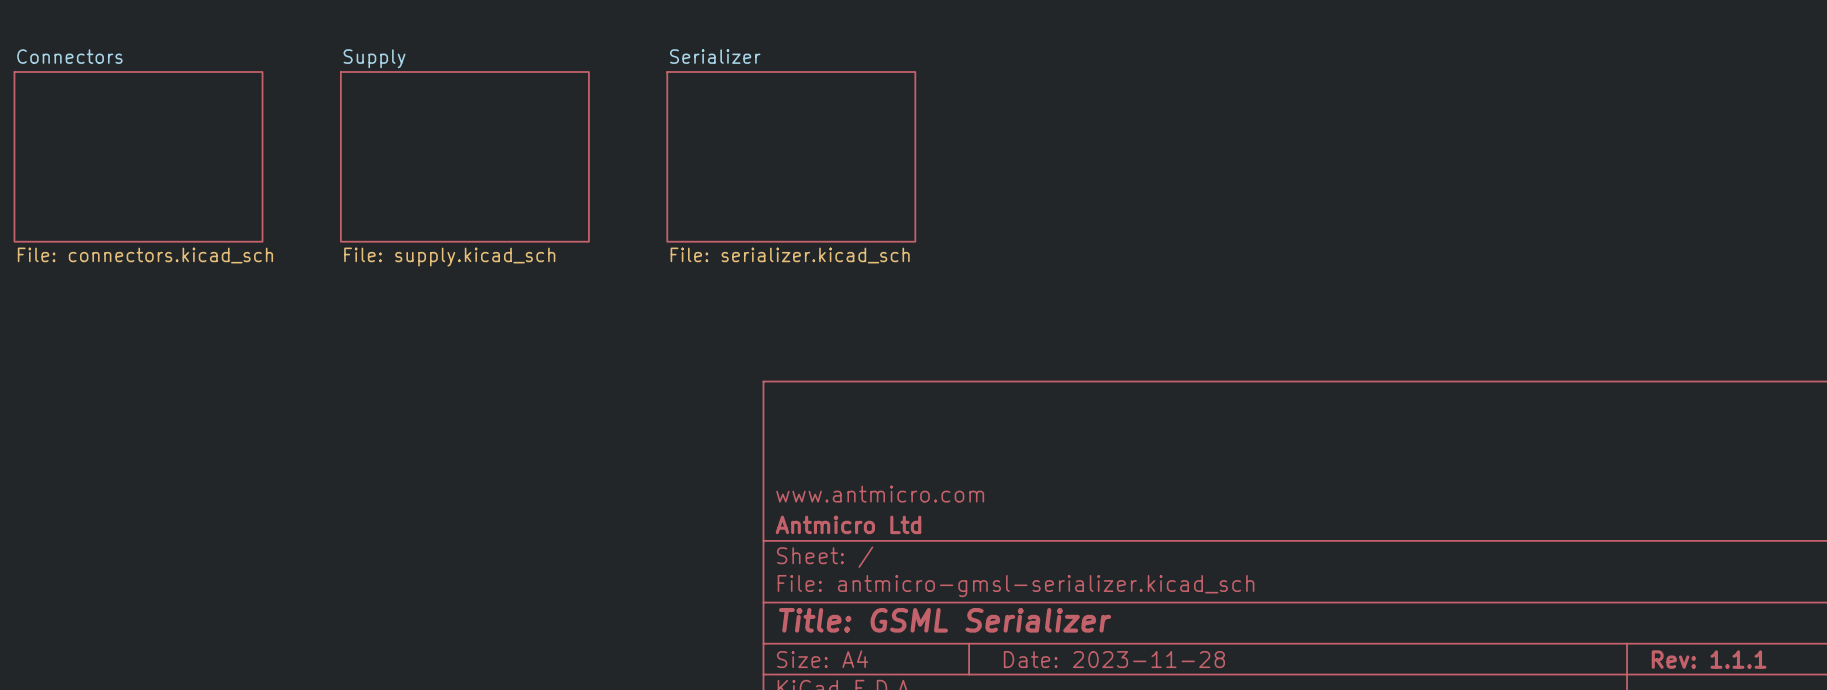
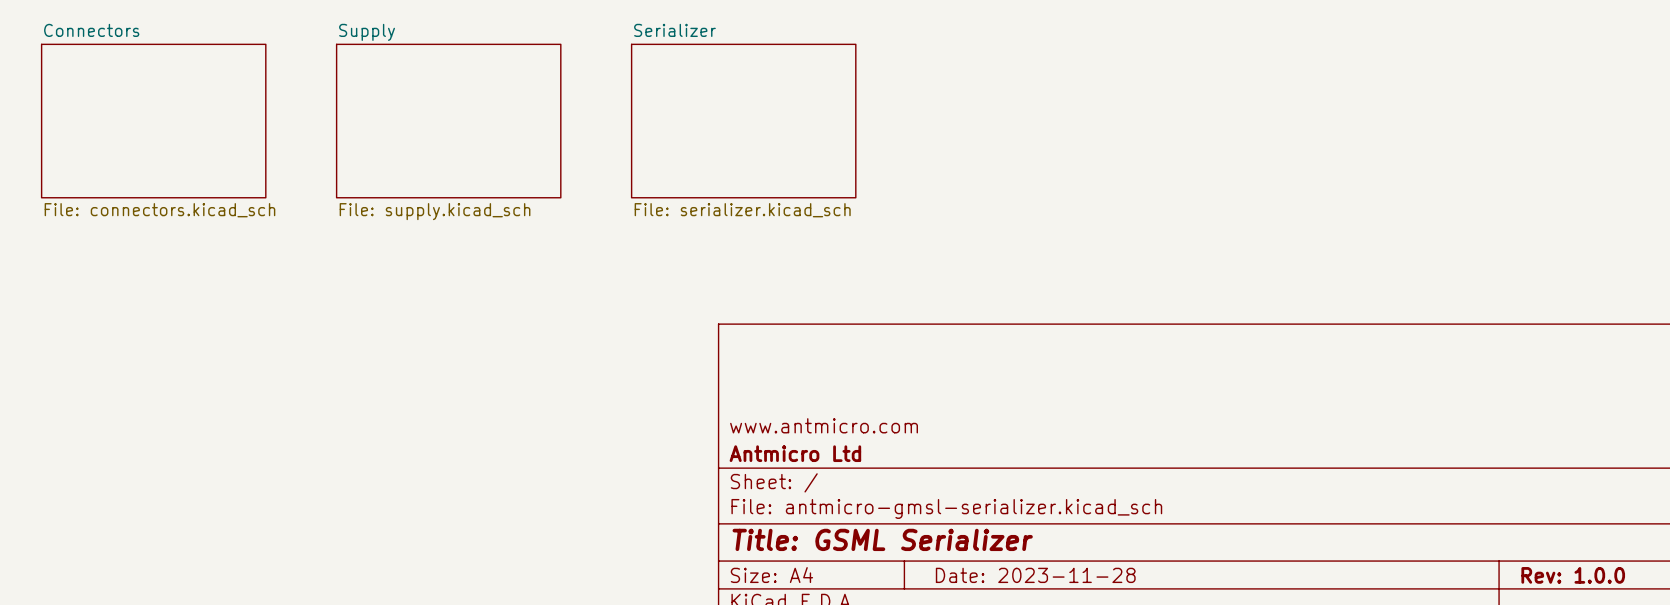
title block: Rev: 1.1.1 (1709, 659) -> Rev: 1.0.0 (1573, 575)

